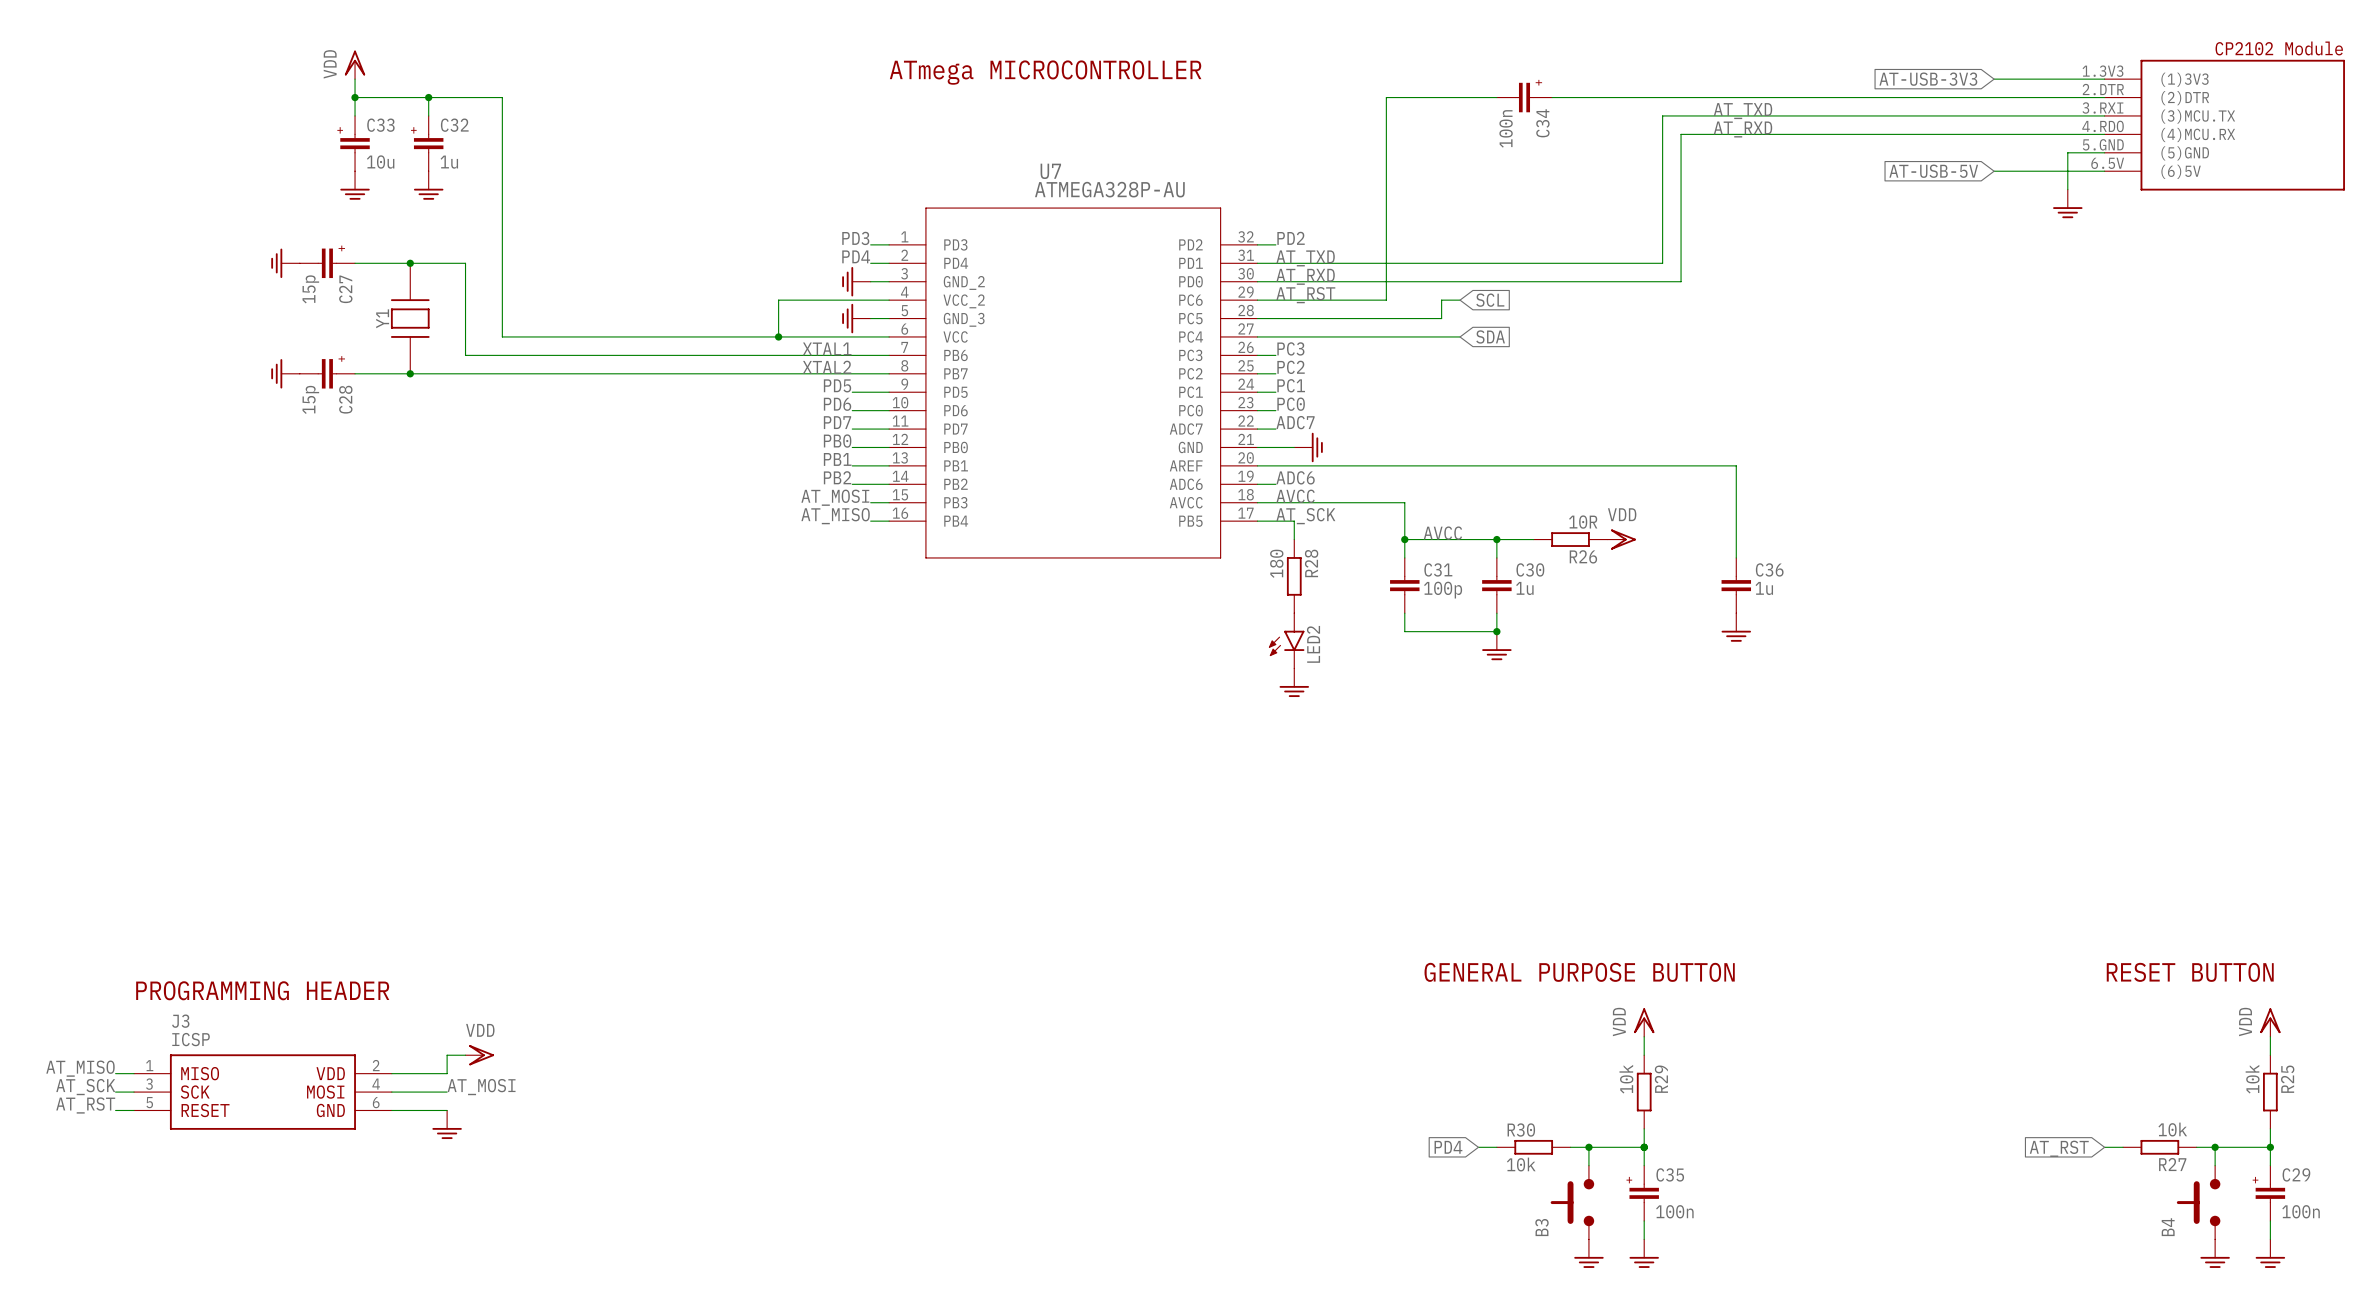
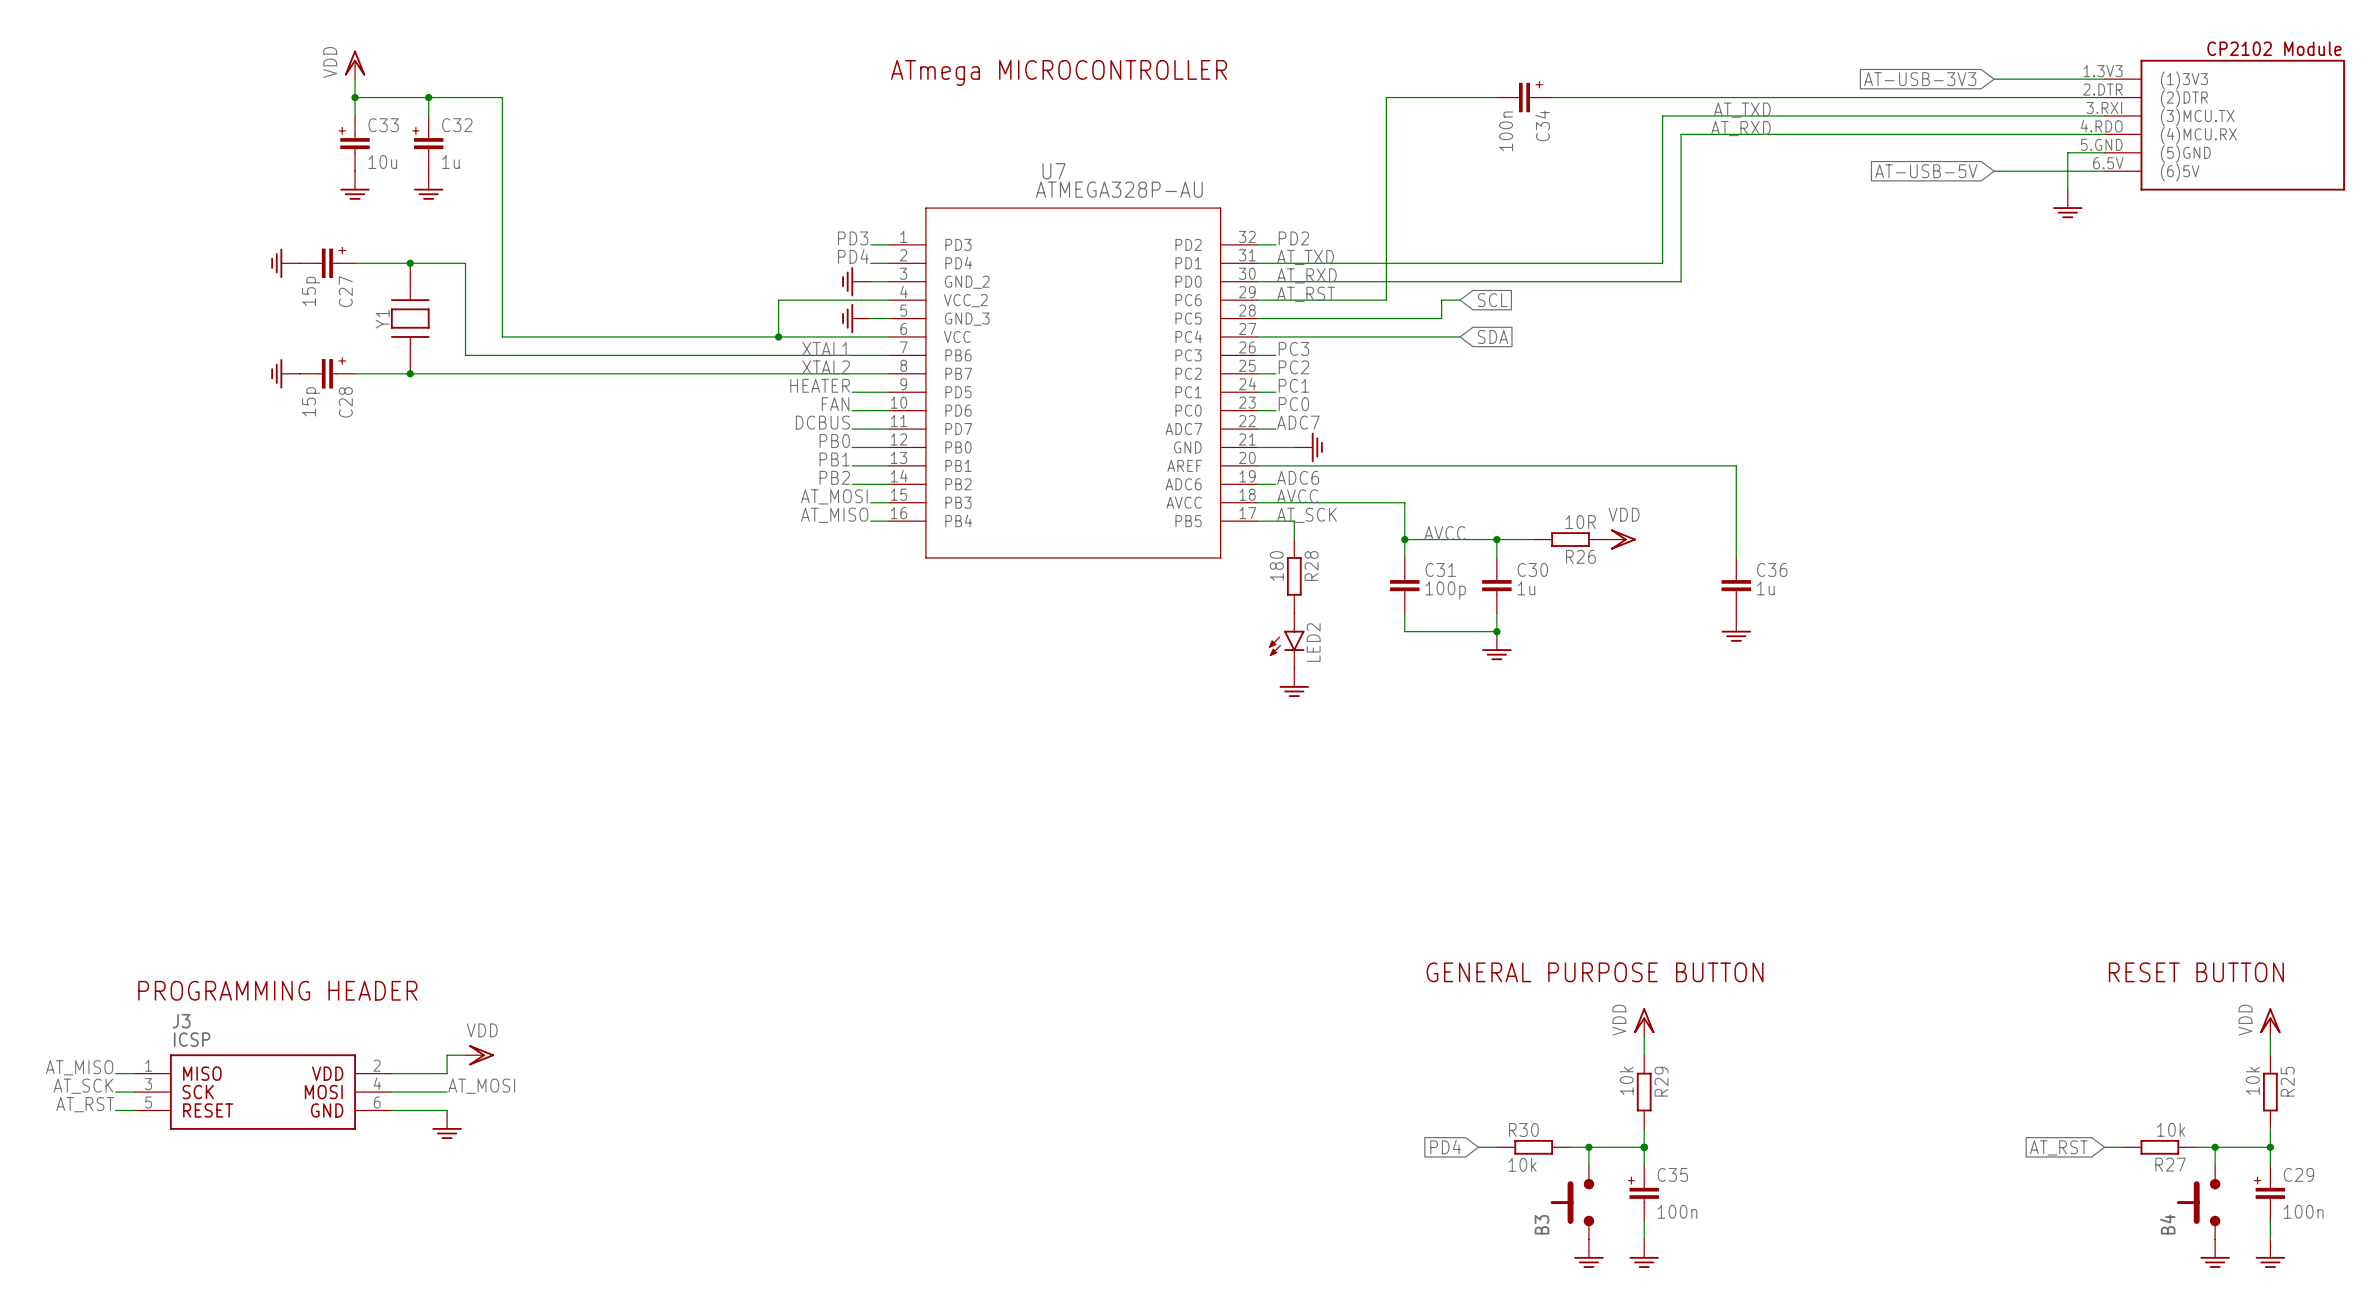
label: PD5 (837, 385) -> HEATER (820, 385)
label: PD6 (837, 404) -> FAN (835, 404)
label: PD7 (837, 422) -> DCBUS (822, 422)

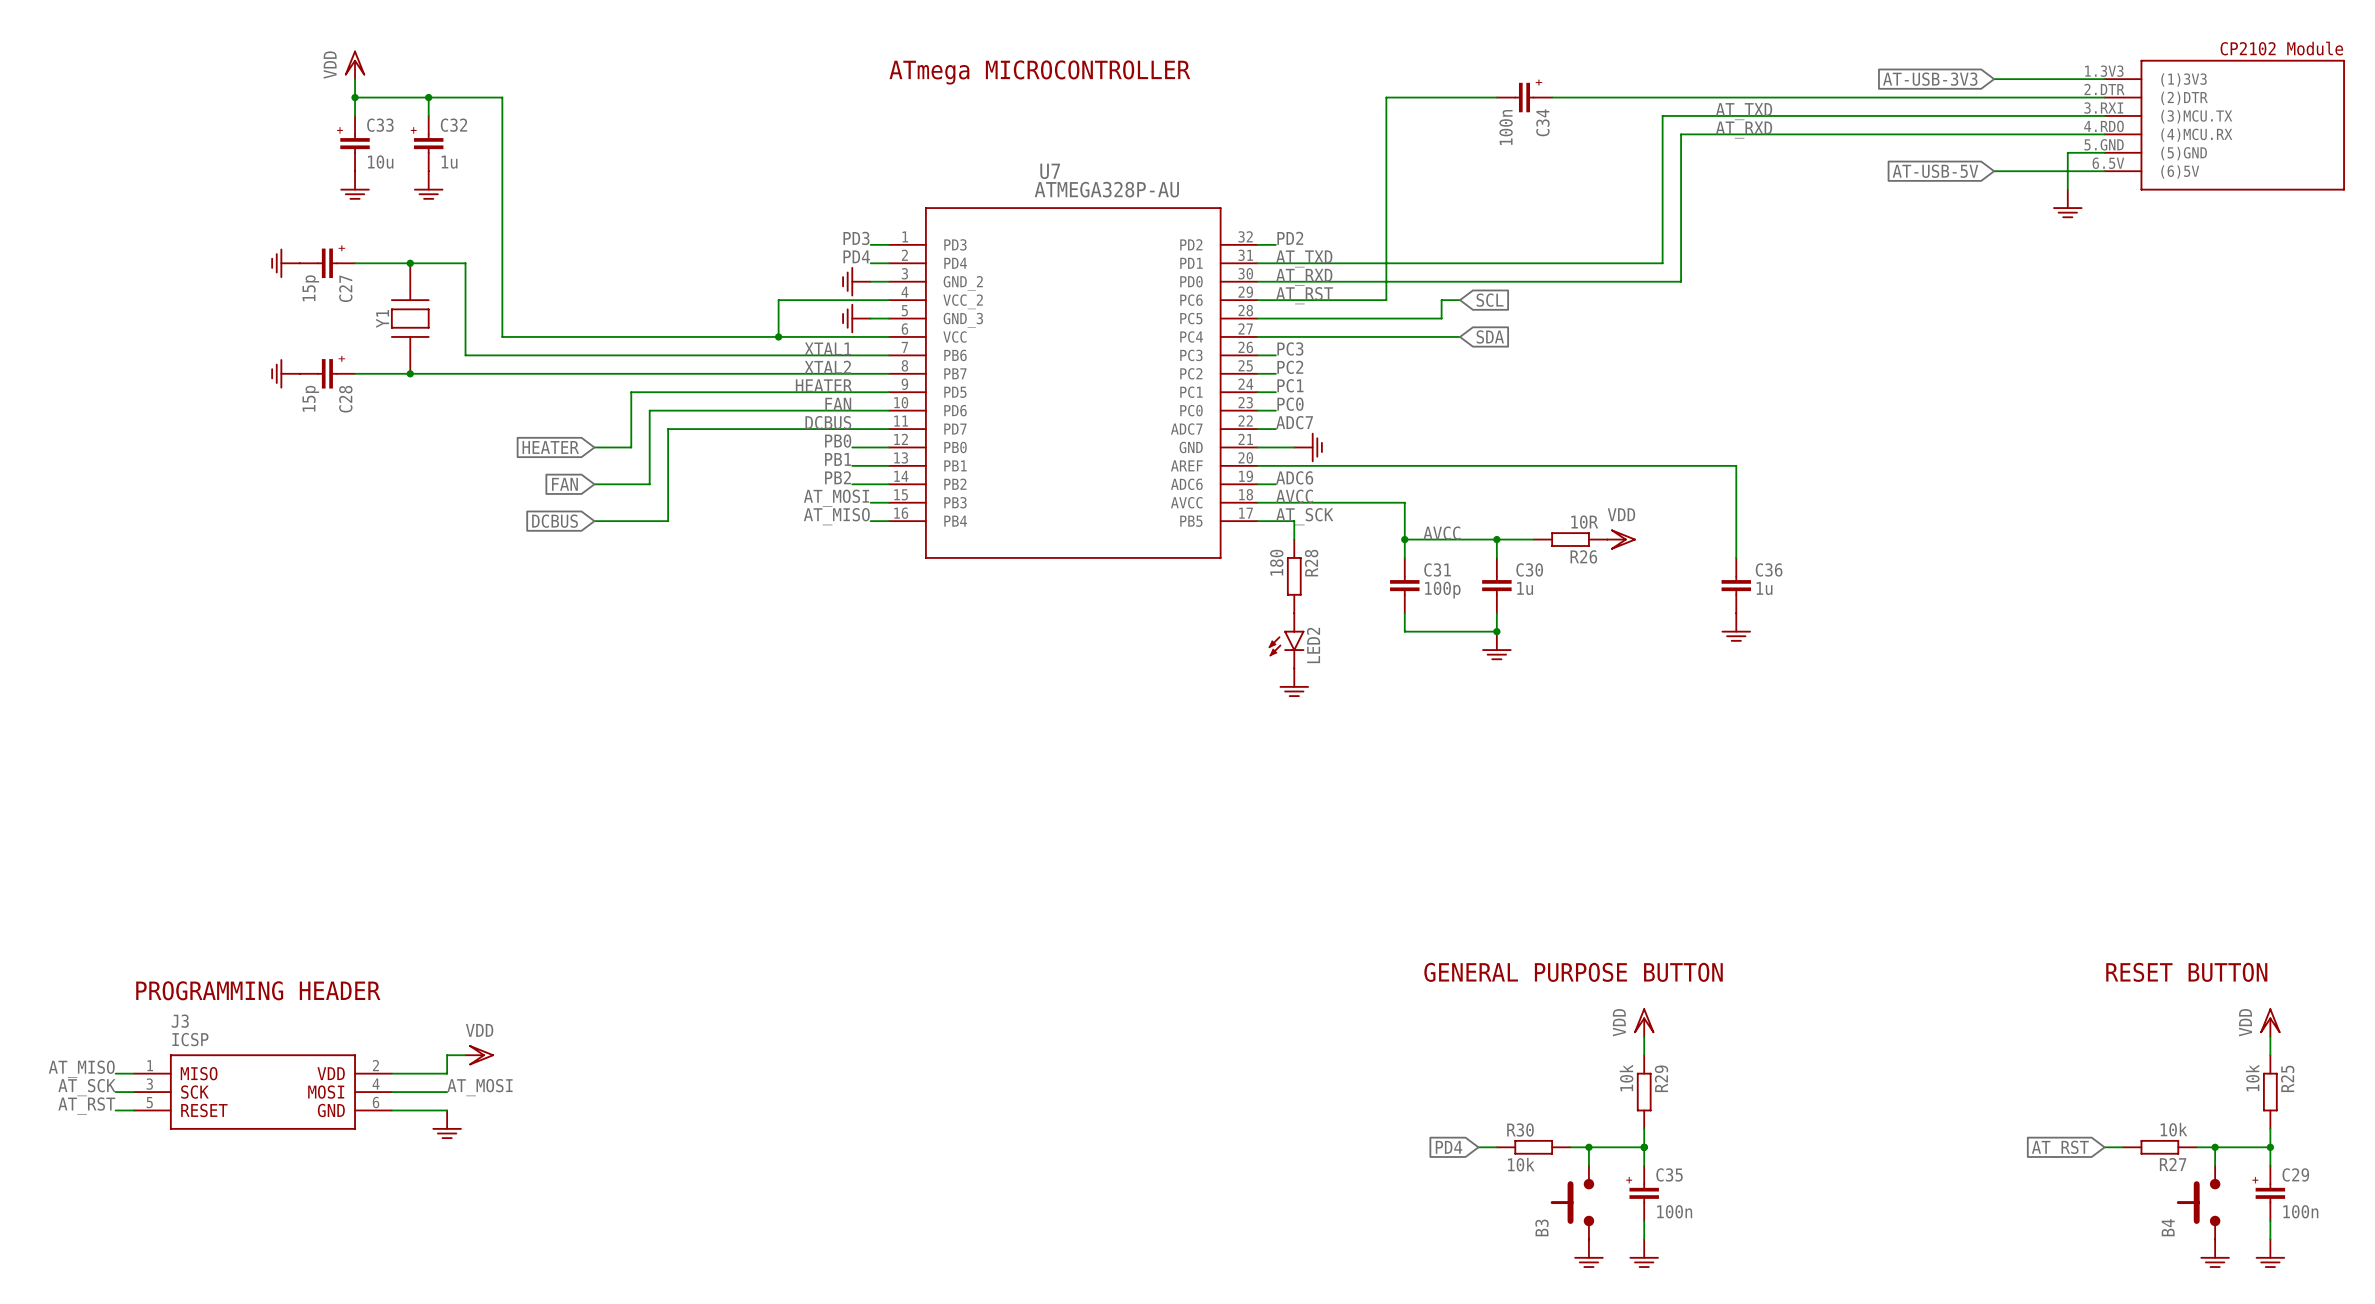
wire: none -> (852, 392) (631, 392) (631, 447) (594, 447)
wire: none -> (852, 410) (649, 410) (649, 484) (594, 484)
wire: none -> (852, 429) (668, 429) (668, 521) (594, 521)
global label: none -> HEATER (550, 447)
global label: none -> FAN (564, 484)
global label: none -> DCBUS (555, 521)

